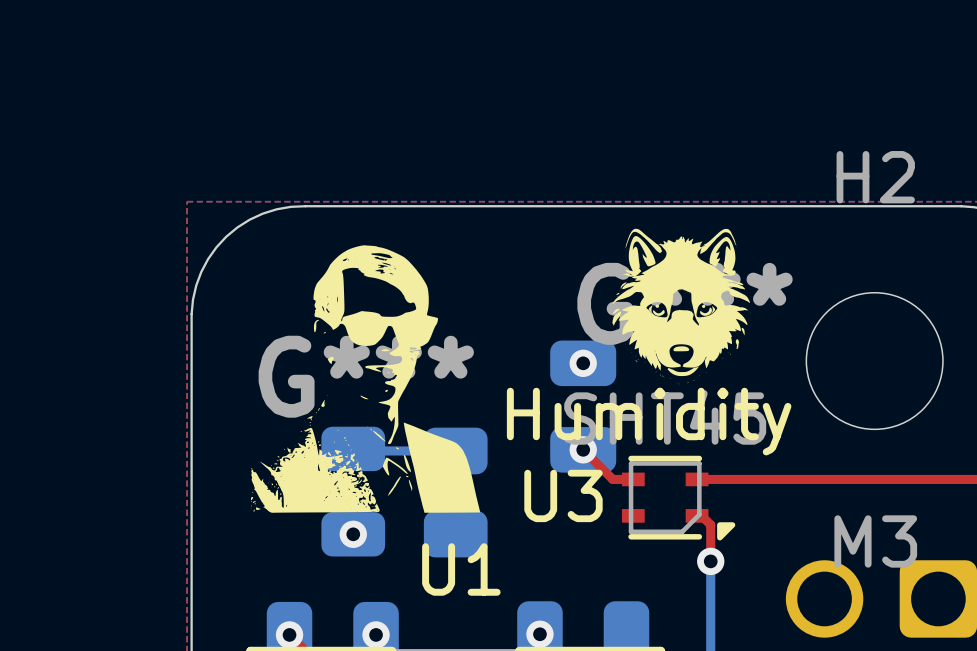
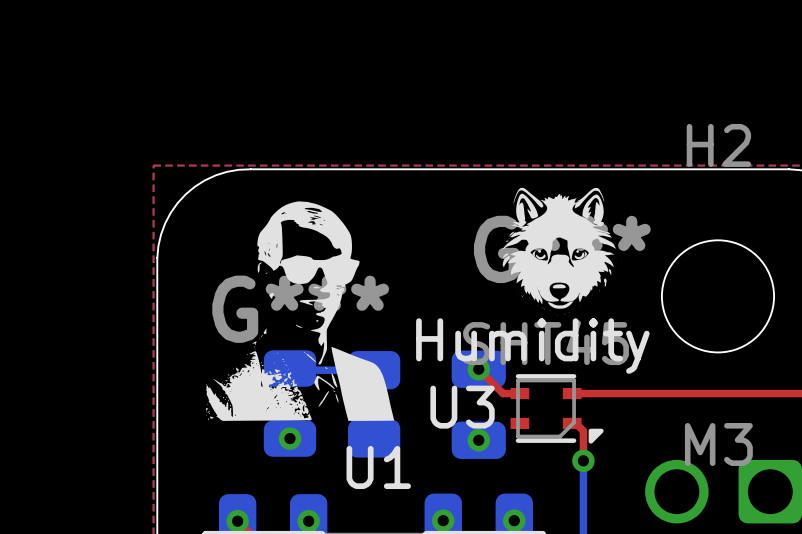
via: (583, 363) -> none
part position: (583, 406) -> (478, 404)
via: none -> (478, 440)
via: none -> (514, 520)

